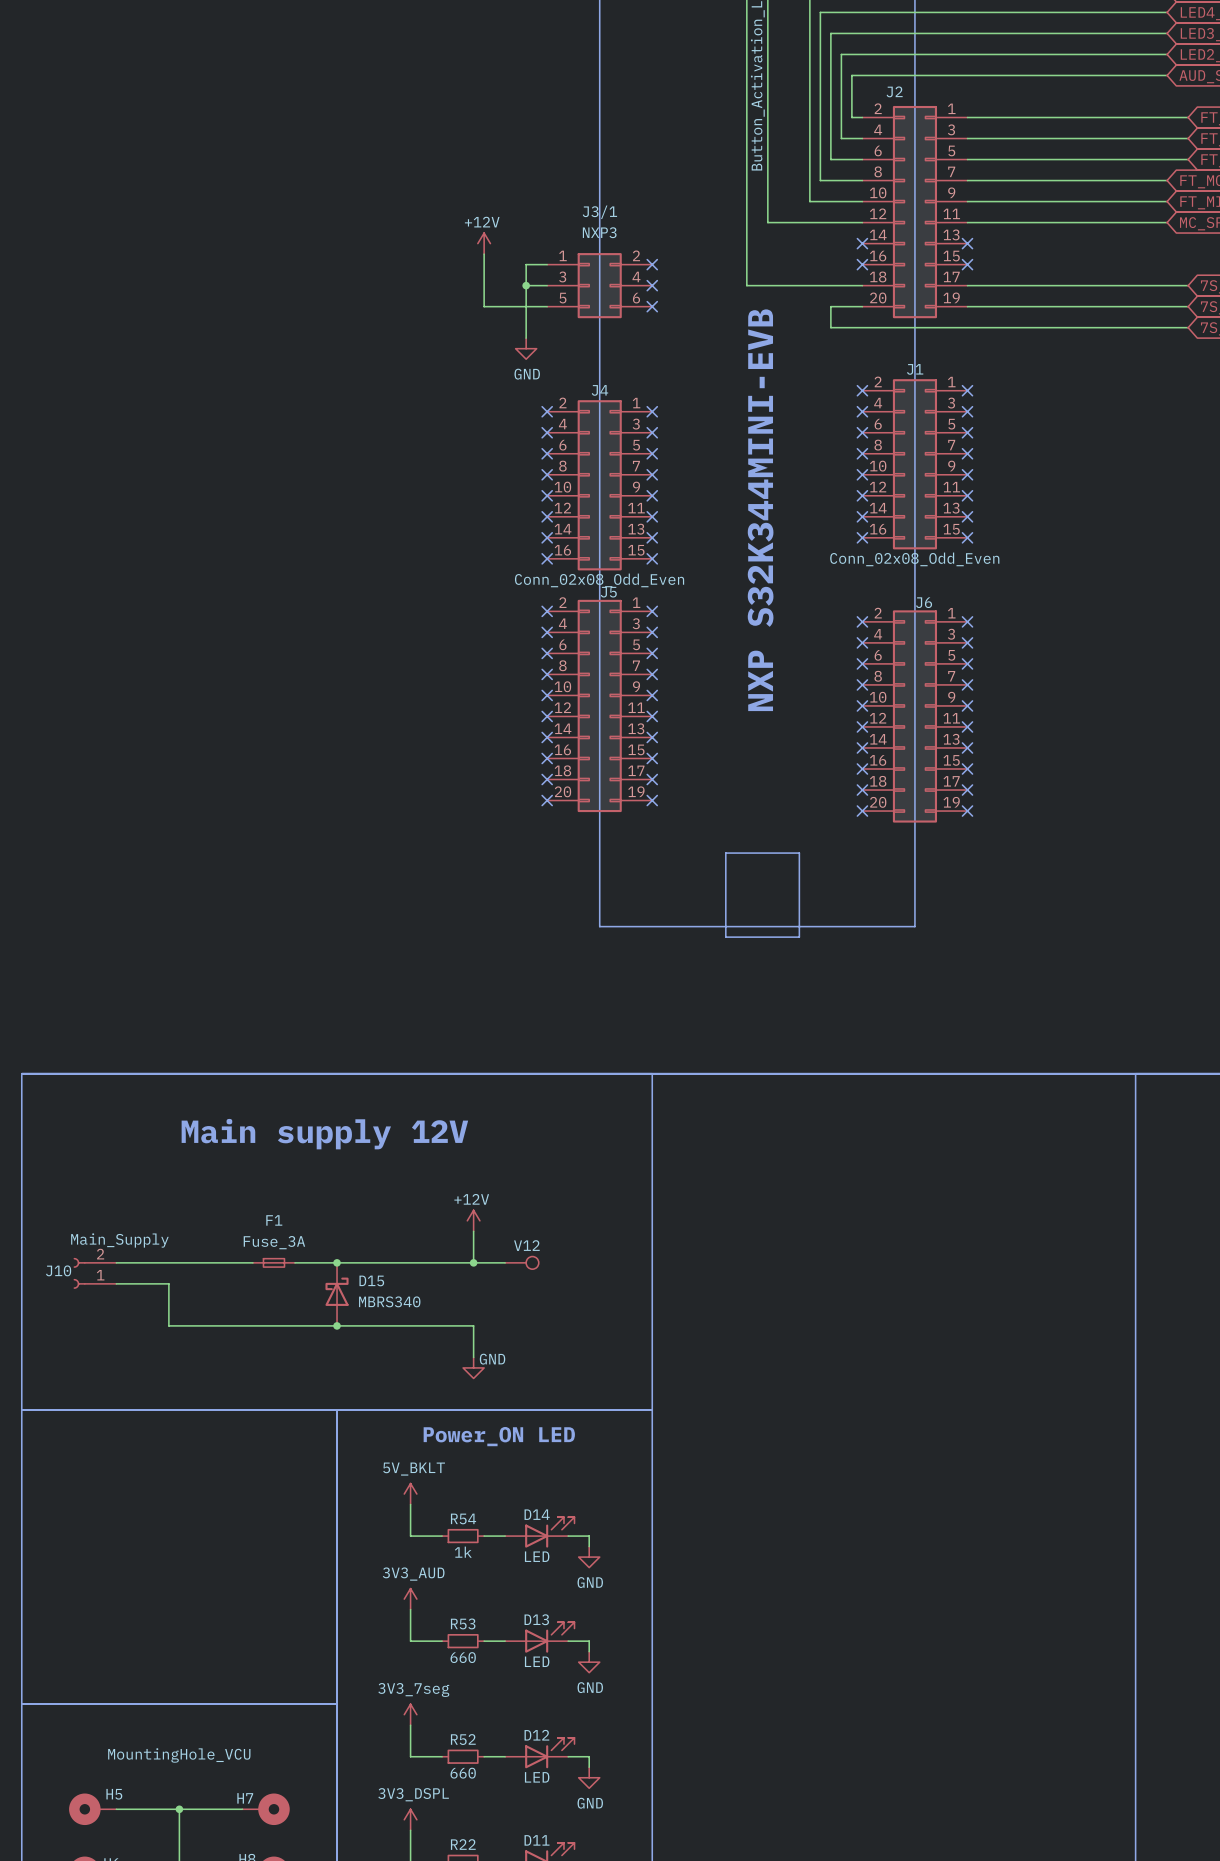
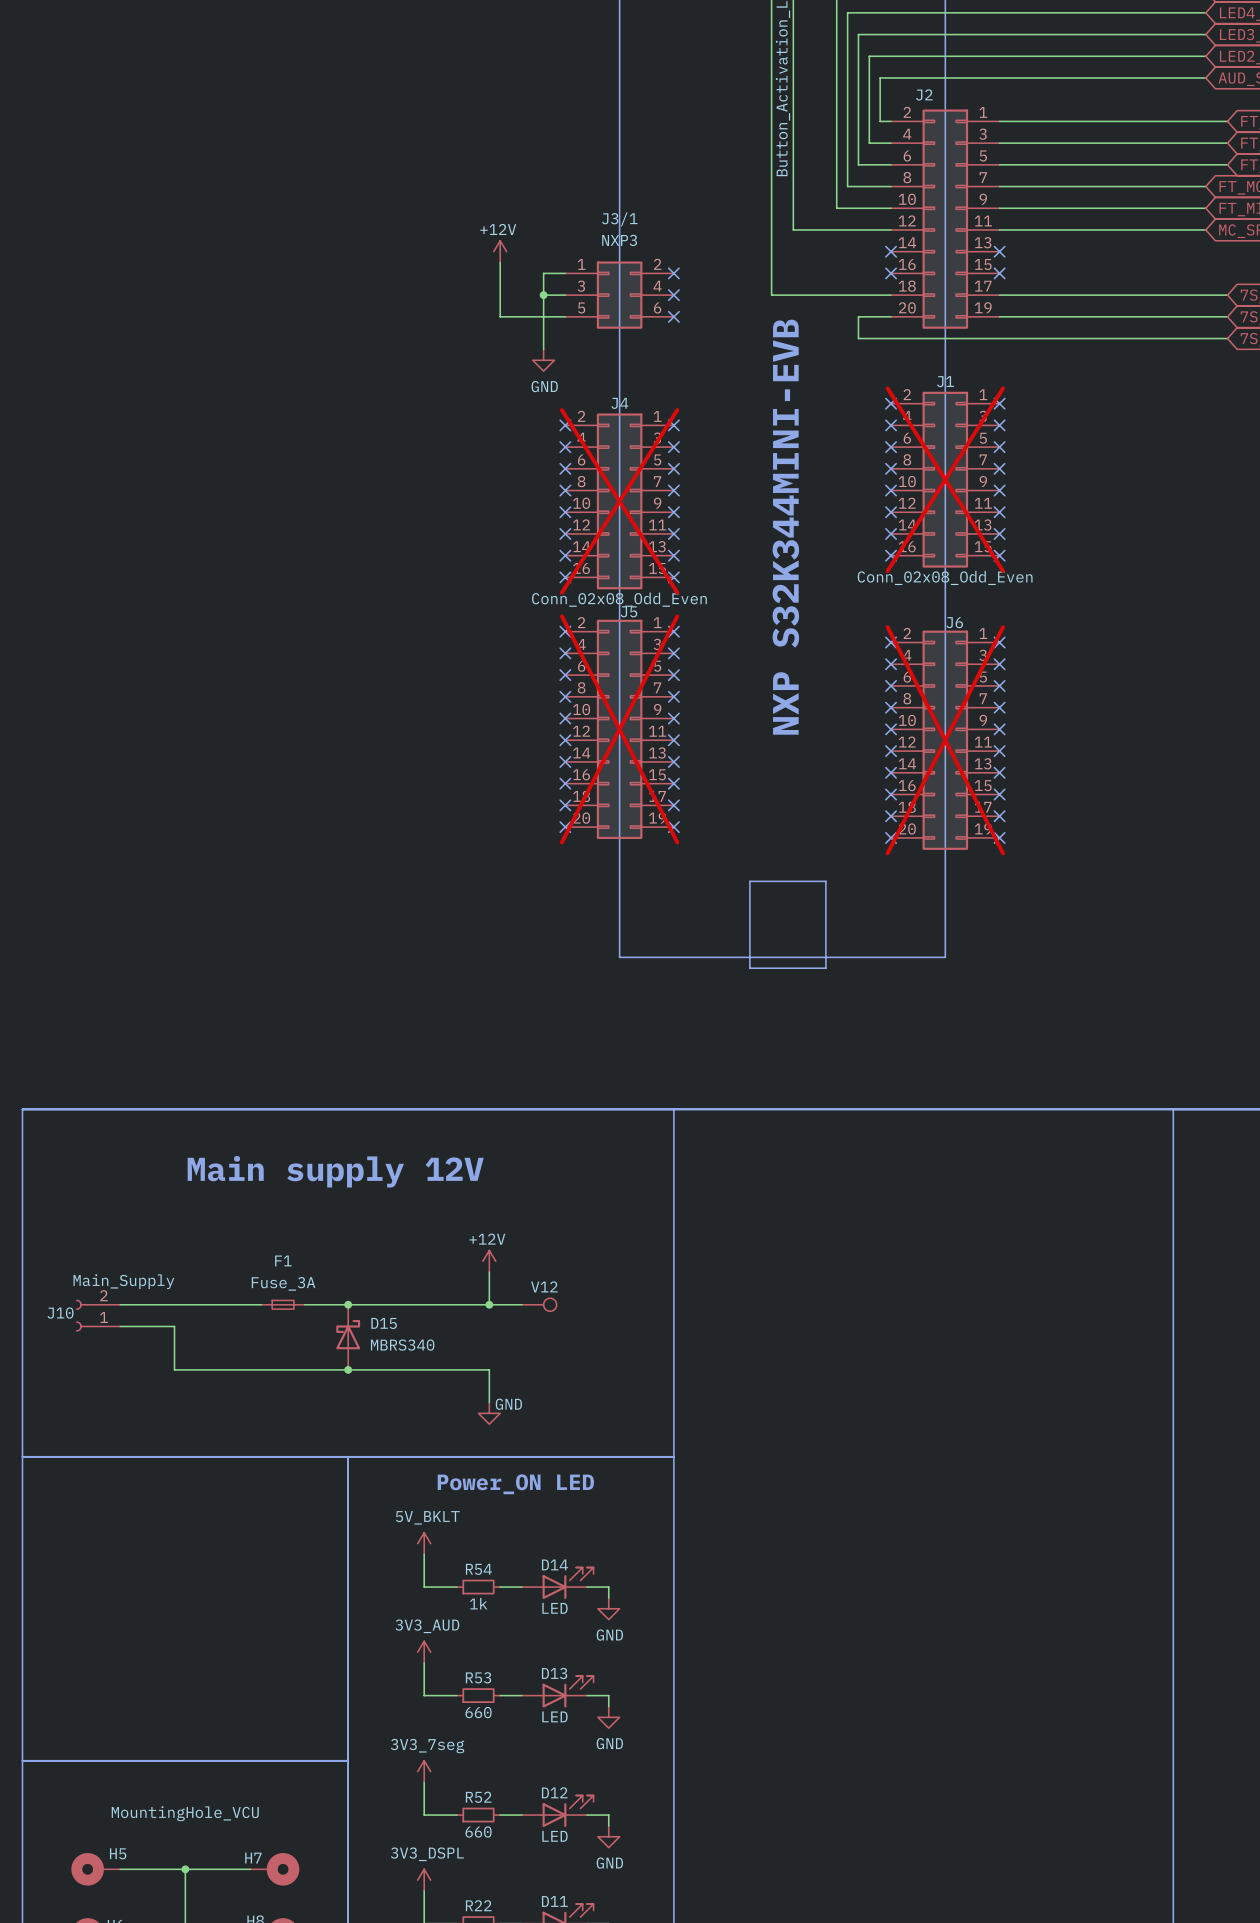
J1 do-not-place cross: none -> (945, 479)
J4 do-not-place cross: none -> (619, 501)
J5 do-not-place cross: none -> (619, 729)
J6 do-not-place cross: none -> (945, 740)

